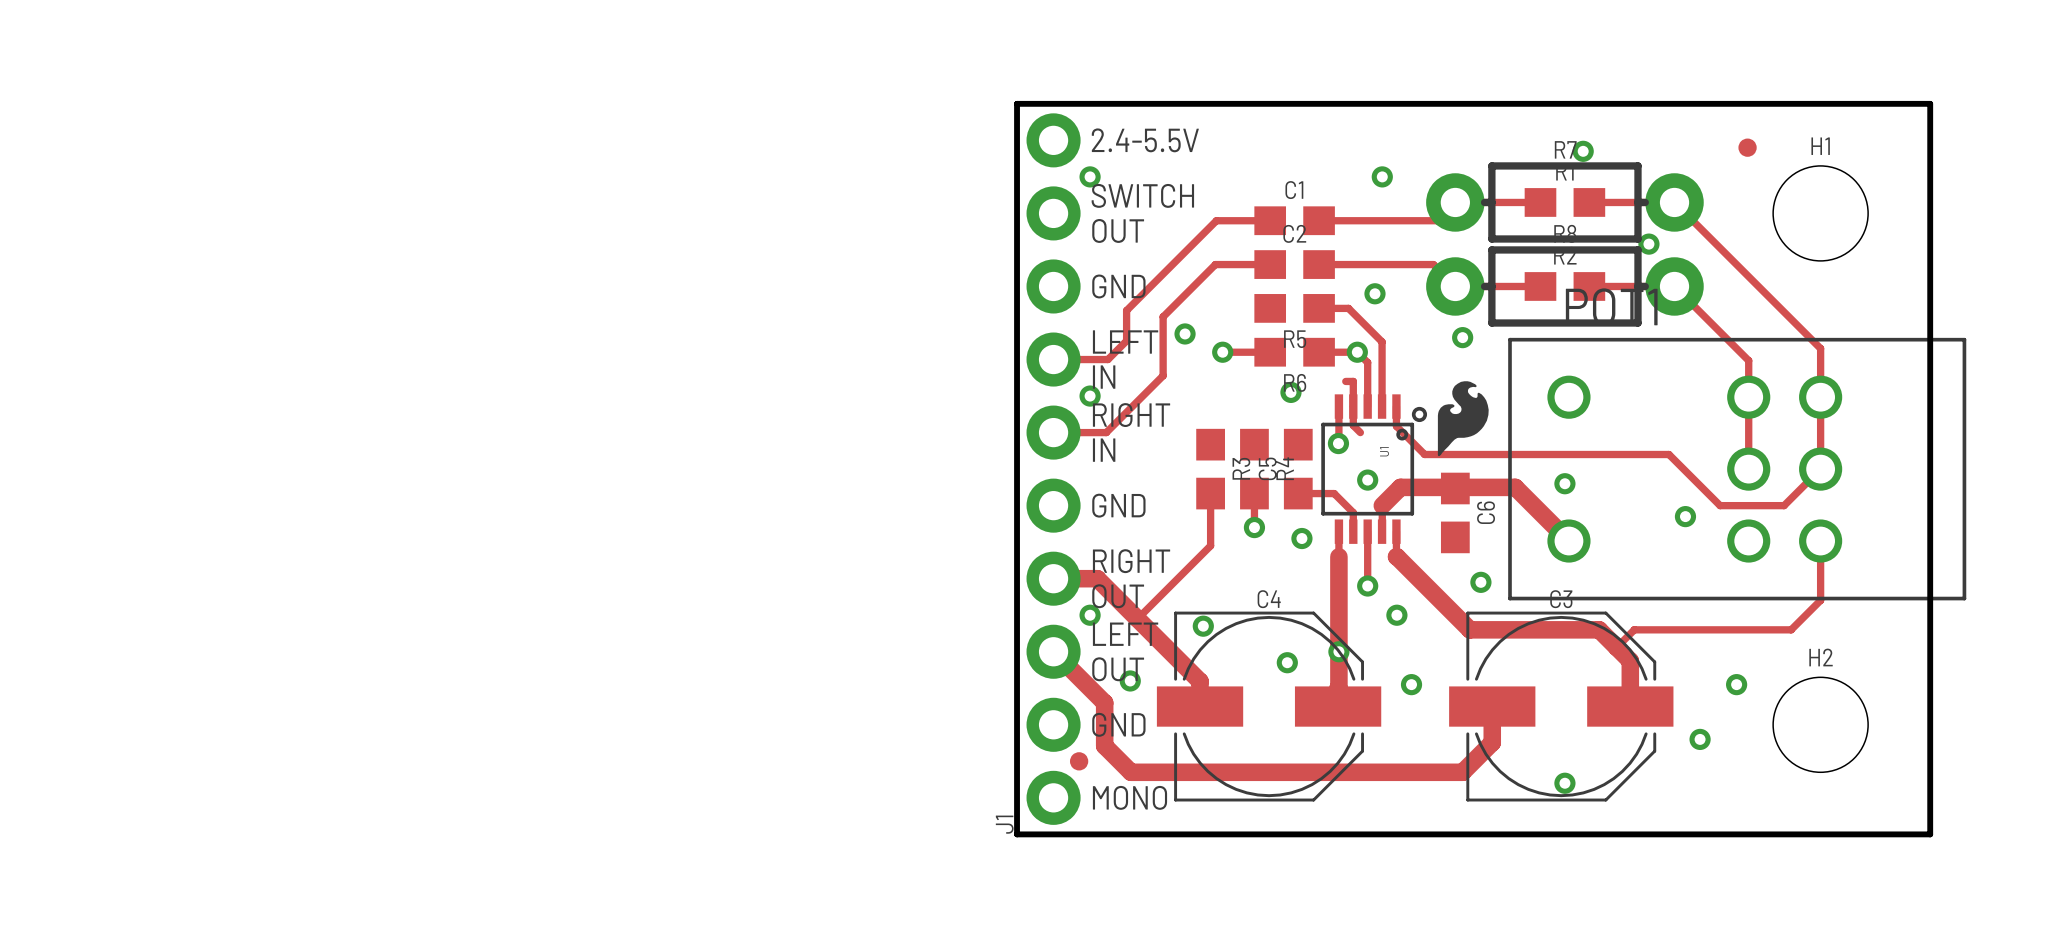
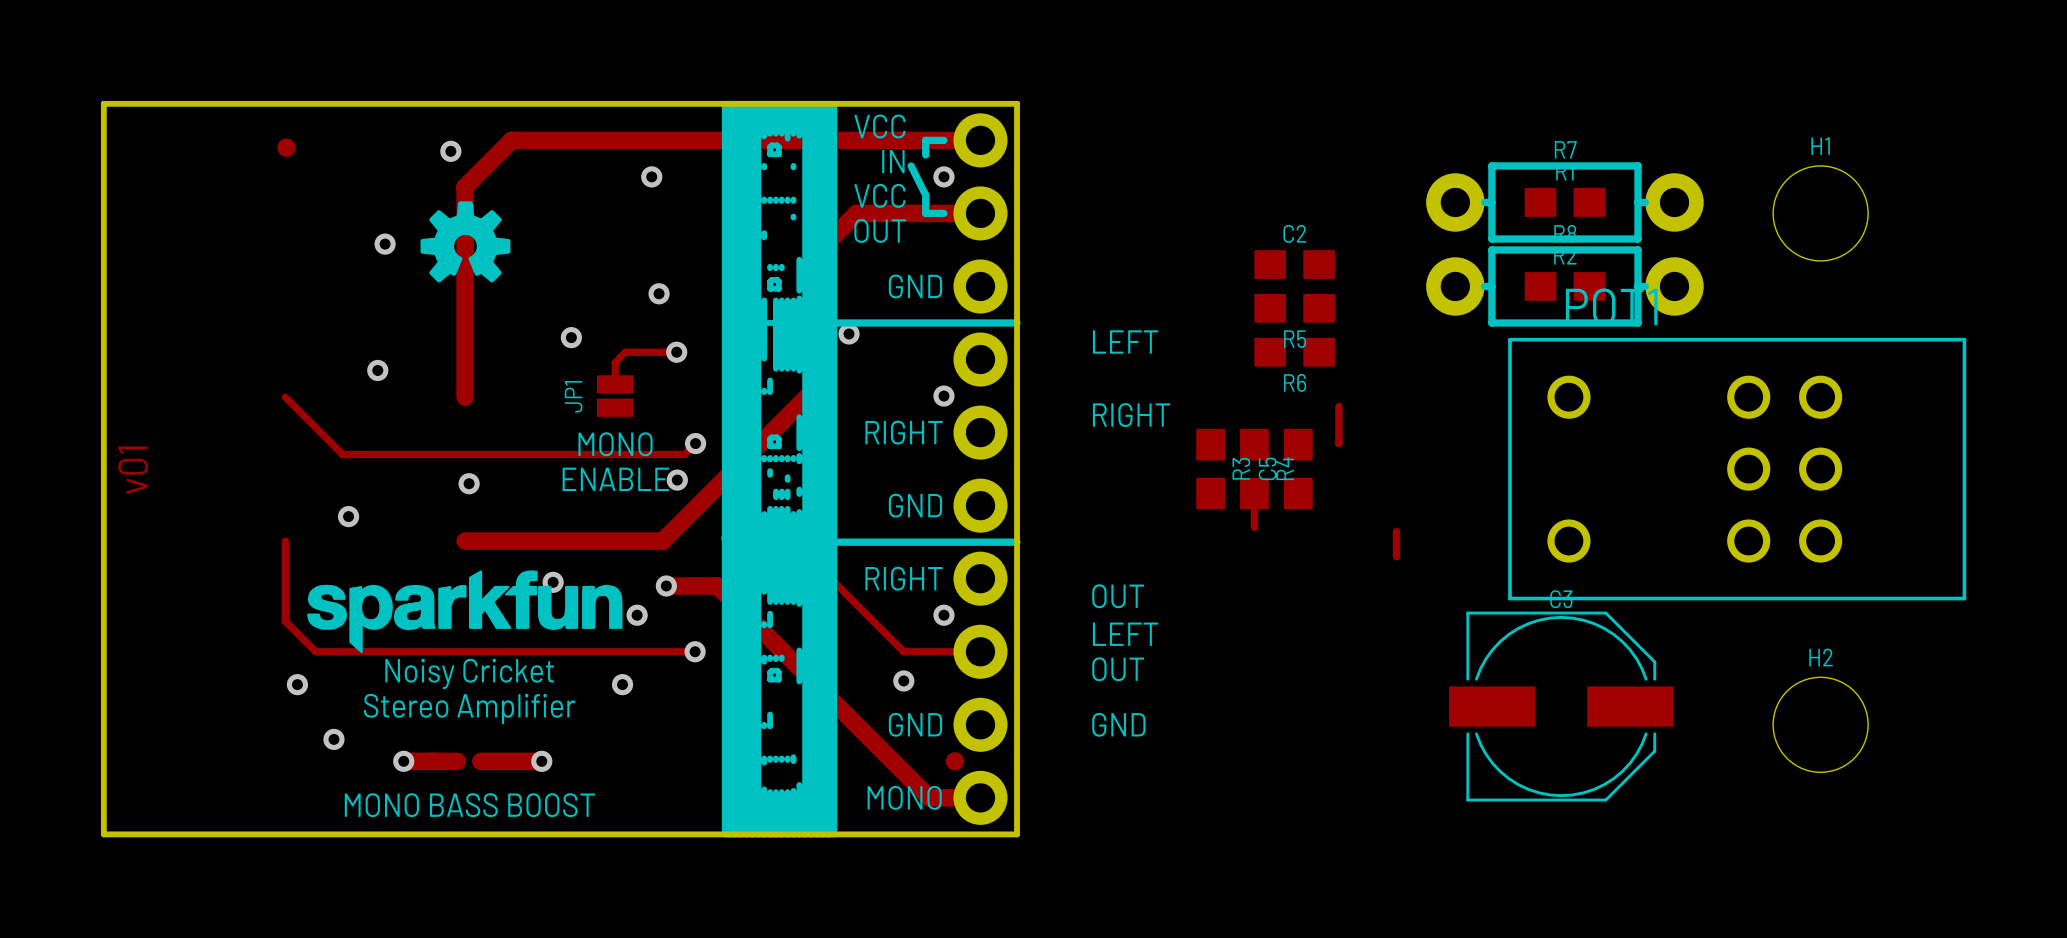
line: none -> (724, 103) (724, 834) (834, 834) (834, 103) (724, 103)
line: none -> (729, 103) (729, 834)
line: none -> (735, 103) (735, 834)
line: none -> (740, 103) (740, 834)
line: none -> (746, 103) (746, 834)
line: none -> (752, 103) (752, 834)
line: none -> (758, 103) (758, 834)
line: none -> (764, 103) (764, 136)
line: none -> (770, 103) (770, 133)
line: none -> (775, 103) (775, 133)
line: none -> (781, 103) (781, 133)
line: none -> (787, 103) (787, 138)
line: none -> (793, 103) (793, 133)
line: none -> (799, 103) (799, 135)
line: none -> (805, 103) (805, 834)
line: none -> (811, 103) (811, 834)
line: none -> (816, 103) (816, 834)
line: none -> (822, 103) (822, 834)
line: none -> (828, 103) (828, 834)
board edge: (1017, 103) (1930, 103) (1930, 834) (1017, 834) -> (1017, 103) (103, 103) (103, 834) (1017, 834)
text: none -> VCC (879, 126)
line: none -> (943, 140) (925, 140) (925, 154)
track: none -> (980, 140) (511, 140) (465, 186) (465, 397)
text: 2.4-5.5V (1145, 140) -> none
line: none -> (771, 145) (770, 154) (778, 154) (778, 147) (771, 145)
part: none -> (286, 147)
part: (1747, 147) -> none
via: none -> (450, 151)
via: (1583, 151) -> none
text: none -> IN (893, 161)
line: none -> (764, 165) (764, 167)
line: none -> (793, 165) (793, 167)
line: none -> (911, 165) (925, 195) (925, 213) (943, 213)
via: none -> (651, 176)
via: none -> (943, 176)
via: (1090, 176) -> none
via: (1382, 176) -> none
text: none -> VCC (879, 195)
text: SWITCH (1142, 195) -> none
line: none -> (764, 199) (764, 201)
line: none -> (770, 199) (770, 201)
line: none -> (775, 199) (775, 201)
line: none -> (781, 199) (781, 201)
line: none -> (787, 199) (787, 201)
line: none -> (793, 199) (793, 201)
drawing: none -> [420, 201, 511, 283]
track: (1540, 202) (1455, 202) (1437, 220) (1319, 220) -> none
track: (1589, 202) (1674, 202) (1820, 348) (1820, 469) (1784, 505) (1720, 505) (1668, 454) (1424, 454) (1396, 426) (1396, 406) -> none
track: none -> (980, 213) (856, 213) (811, 258) (811, 392) (662, 541) (465, 541)
line: none -> (793, 216) (793, 217)
track: (1270, 220) (1216, 220) (1126, 310) (1126, 340) (1107, 359) (1053, 359) -> none
C1: (1294, 220) -> none
text position: OUT (1118, 230) -> OUT (880, 230)
line: none -> (764, 233) (764, 237)
via: none -> (385, 244)
via: (1648, 244) -> none
line: none -> (799, 259) (799, 290)
track: (1270, 264) (1215, 264) (1163, 316) (1163, 375) (1106, 432) (1053, 432) -> none
track: (1319, 264) (1433, 264) (1455, 286) (1540, 286) -> none
line: none -> (770, 266) (770, 268)
line: none -> (775, 266) (775, 268)
line: none -> (781, 266) (781, 268)
line: none -> (771, 279) (770, 288) (778, 288) (778, 281) (771, 279)
text: none -> GND (915, 286)
text: GND (1118, 286) -> none
track: (1589, 286) (1674, 286) (1748, 360) (1748, 469) -> none
via: none -> (659, 293)
via: (1374, 293) -> none
line: none -> (799, 298) (799, 370)
line: none -> (764, 300) (764, 358)
line: none -> (775, 300) (775, 368)
line: none -> (781, 300) (781, 368)
line: none -> (787, 300) (787, 368)
line: none -> (793, 300) (793, 368)
track: (1319, 308) (1348, 308) (1382, 341) (1382, 406) -> none
line: none -> (724, 323) (1017, 323)
via: none -> (849, 333)
via: (1185, 333) -> none
via: none -> (571, 337)
via: (1462, 337) -> none
track: none -> (676, 352) (625, 352) (615, 362) (615, 384)
via: none -> (676, 352)
track: (1222, 352) (1270, 352) -> none
via: (1222, 352) -> none
track: (1319, 352) (1357, 352) (1367, 362) (1367, 406) -> none
via: (1357, 352) -> none
via: none -> (377, 370)
text: IN (1104, 377) -> none
line: none -> (770, 380) (770, 392)
track: (1345, 381) (1353, 381) (1353, 425) (1360, 432) -> none
drawing: [1437, 381, 1489, 457] -> none
line: none -> (764, 390) (764, 392)
via: (1290, 392) -> none
JP1: none -> (615, 396)
via: none -> (943, 396)
via: (1090, 396) -> none
track: none -> (285, 397) (342, 454) (684, 454) (695, 443)
line: none -> (799, 417) (799, 448)
text: none -> RIGHT (904, 432)
line: none -> (771, 437) (770, 446) (778, 446) (778, 439) (771, 437)
via: none -> (695, 443)
via: (1338, 443) -> none
text: none -> MONO (615, 444)
text: IN (1104, 450) -> none
line: none -> (799, 455) (799, 461)
line: none -> (764, 457) (764, 459)
line: none -> (770, 457) (770, 459)
line: none -> (775, 457) (775, 459)
line: none -> (781, 457) (781, 459)
line: none -> (787, 457) (787, 459)
line: none -> (793, 457) (793, 459)
J1 position: (1053, 469) -> (980, 469)
U1: (1374, 469) -> none
text: none -> v01 (133, 470)
line: none -> (770, 471) (770, 474)
line: none -> (787, 477) (787, 479)
text: none -> ENABLE (615, 479)
via: none -> (677, 480)
via: (1367, 480) -> none
via: none -> (469, 483)
via: (1564, 483) -> none
line: none -> (799, 489) (799, 494)
line: none -> (775, 491) (775, 497)
line: none -> (781, 491) (781, 497)
line: none -> (787, 491) (787, 497)
track: (1210, 493) (1210, 545) (1137, 618) -> none
track: (1298, 493) (1334, 493) (1353, 512) (1353, 531) -> none
text: none -> GND (915, 505)
text: GND (1118, 505) -> none
line: none -> (770, 508) (770, 602)
line: none -> (775, 508) (775, 602)
line: none -> (781, 508) (781, 602)
line: none -> (787, 508) (787, 602)
line: none -> (799, 512) (799, 603)
C6: (1455, 512) -> none
line: none -> (764, 513) (764, 591)
line: none -> (793, 513) (793, 602)
via: none -> (348, 516)
via: (1685, 516) -> none
track: none -> (779, 527) (903, 651) (980, 651)
via: (1254, 527) -> none
track: (1338, 531) (1338, 706) -> none
track: (1367, 531) (1367, 586) -> none
track: (1382, 531) (1382, 505) (1400, 487) (1515, 487) (1568, 541) -> none
via: (1301, 538) -> none
track: none -> (285, 541) (285, 621) (315, 651) (695, 651)
track: (1820, 541) (1820, 600) (1791, 629) (1634, 629) (1616, 647) -> none
line: none -> (724, 542) (1017, 542)
track: (1396, 556) (1469, 629) (1599, 629) (1630, 660) (1630, 706) -> none
text: RIGHT (1131, 561) -> none
drawing: none -> [307, 570, 623, 654]
text: none -> RIGHT (904, 578)
track: (1053, 578) (1097, 578) (1200, 681) (1200, 706) -> none
via: none -> (553, 582)
via: (1480, 582) -> none
track: none -> (666, 586) (717, 586) (929, 797) (980, 797)
via: none -> (666, 586)
via: (1367, 586) -> none
line: none -> (770, 613) (770, 625)
via: none -> (637, 615)
via: none -> (943, 615)
via: (1090, 615) -> none
via: (1396, 615) -> none
line: none -> (764, 623) (764, 625)
via: (1203, 626) -> none
line: none -> (799, 650) (799, 681)
via: none -> (695, 651)
track: (1053, 651) (1104, 702) (1104, 745) (1131, 772) (1462, 772) (1492, 742) (1492, 706) -> none
via: (1338, 651) -> none
line: none -> (764, 657) (764, 661)
line: none -> (770, 657) (770, 659)
line: none -> (775, 657) (775, 659)
line: none -> (781, 657) (781, 659)
via: (1287, 662) -> none
line: none -> (771, 670) (770, 679) (778, 679) (778, 672) (771, 670)
text: none -> Noisy Cricket (469, 673)
via: none -> (903, 680)
via: (1130, 680) -> none
via: none -> (297, 684)
via: none -> (622, 684)
via: (1411, 684) -> none
via: (1736, 684) -> none
C4: (1269, 706) -> none
text: none -> Stereo Amplifier (469, 708)
line: none -> (770, 714) (770, 726)
line: none -> (764, 724) (764, 726)
text: none -> GND (915, 724)
via: none -> (333, 739)
via: (1700, 739) -> none
line: none -> (793, 757) (793, 761)
line: none -> (764, 758) (764, 762)
line: none -> (770, 758) (770, 759)
line: none -> (775, 758) (775, 759)
line: none -> (781, 758) (781, 759)
line: none -> (787, 758) (787, 759)
track: none -> (403, 761) (457, 761)
via: none -> (403, 761)
track: none -> (480, 761) (541, 761)
via: none -> (541, 761)
part position: (1079, 761) -> (954, 761)
via: (1564, 783) -> none
line: none -> (799, 785) (799, 834)
line: none -> (764, 789) (764, 834)
line: none -> (793, 790) (793, 834)
line: none -> (770, 792) (770, 834)
line: none -> (775, 792) (775, 834)
line: none -> (781, 792) (781, 834)
line: none -> (787, 792) (787, 834)
text position: MONO (1129, 797) -> MONO (904, 797)
text: none -> MONO BASS BOOST (469, 805)

